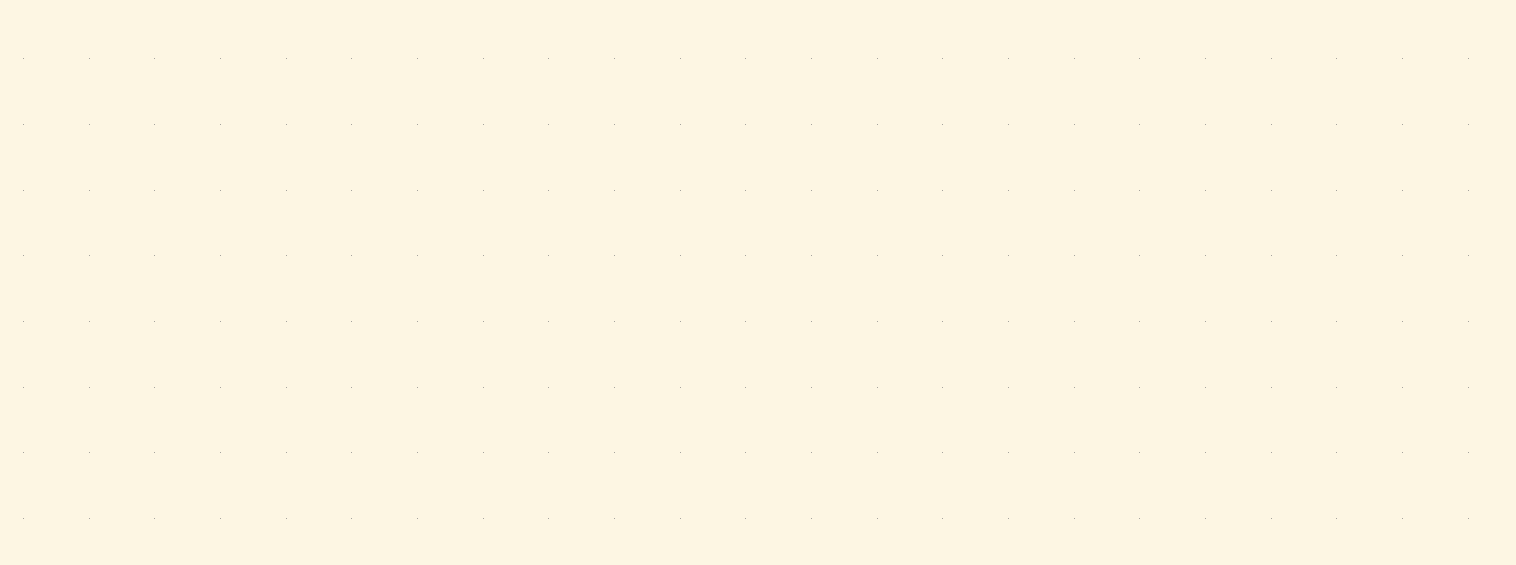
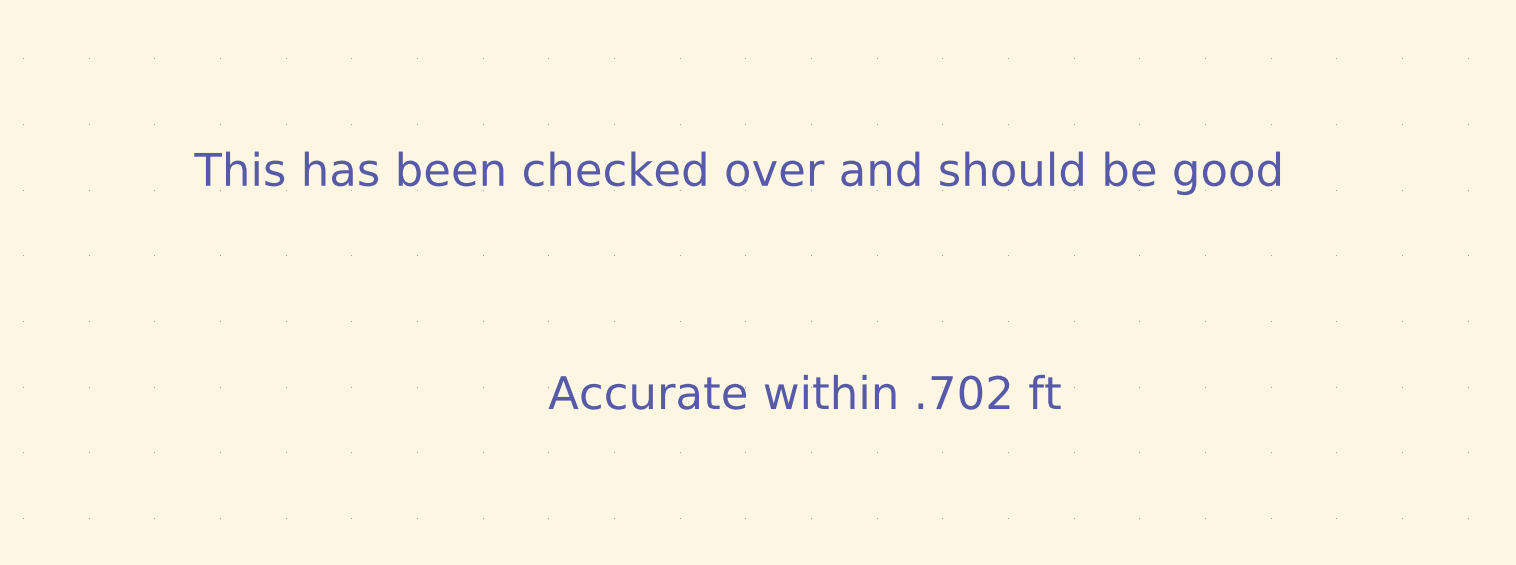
text: none -> This has been checked over and should be good (737, 173)
text: none -> Accurate within .702 ft (804, 392)

